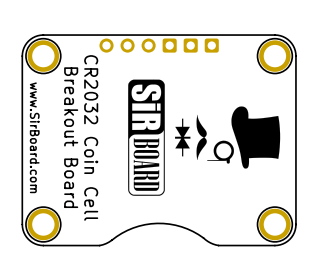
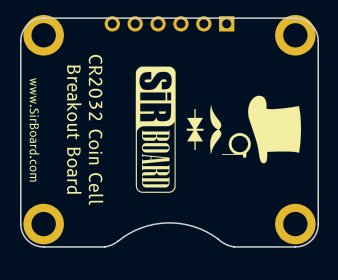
part footprint: [25, 38, 62, 75] -> [23, 15, 64, 56]
part footprint: [99, 38, 219, 53] -> [104, 16, 235, 32]
part footprint: [256, 38, 293, 75] -> [275, 15, 316, 56]
part footprint: [25, 206, 62, 243] -> [23, 203, 64, 245]
part footprint: [256, 206, 293, 243] -> [275, 203, 316, 245]

